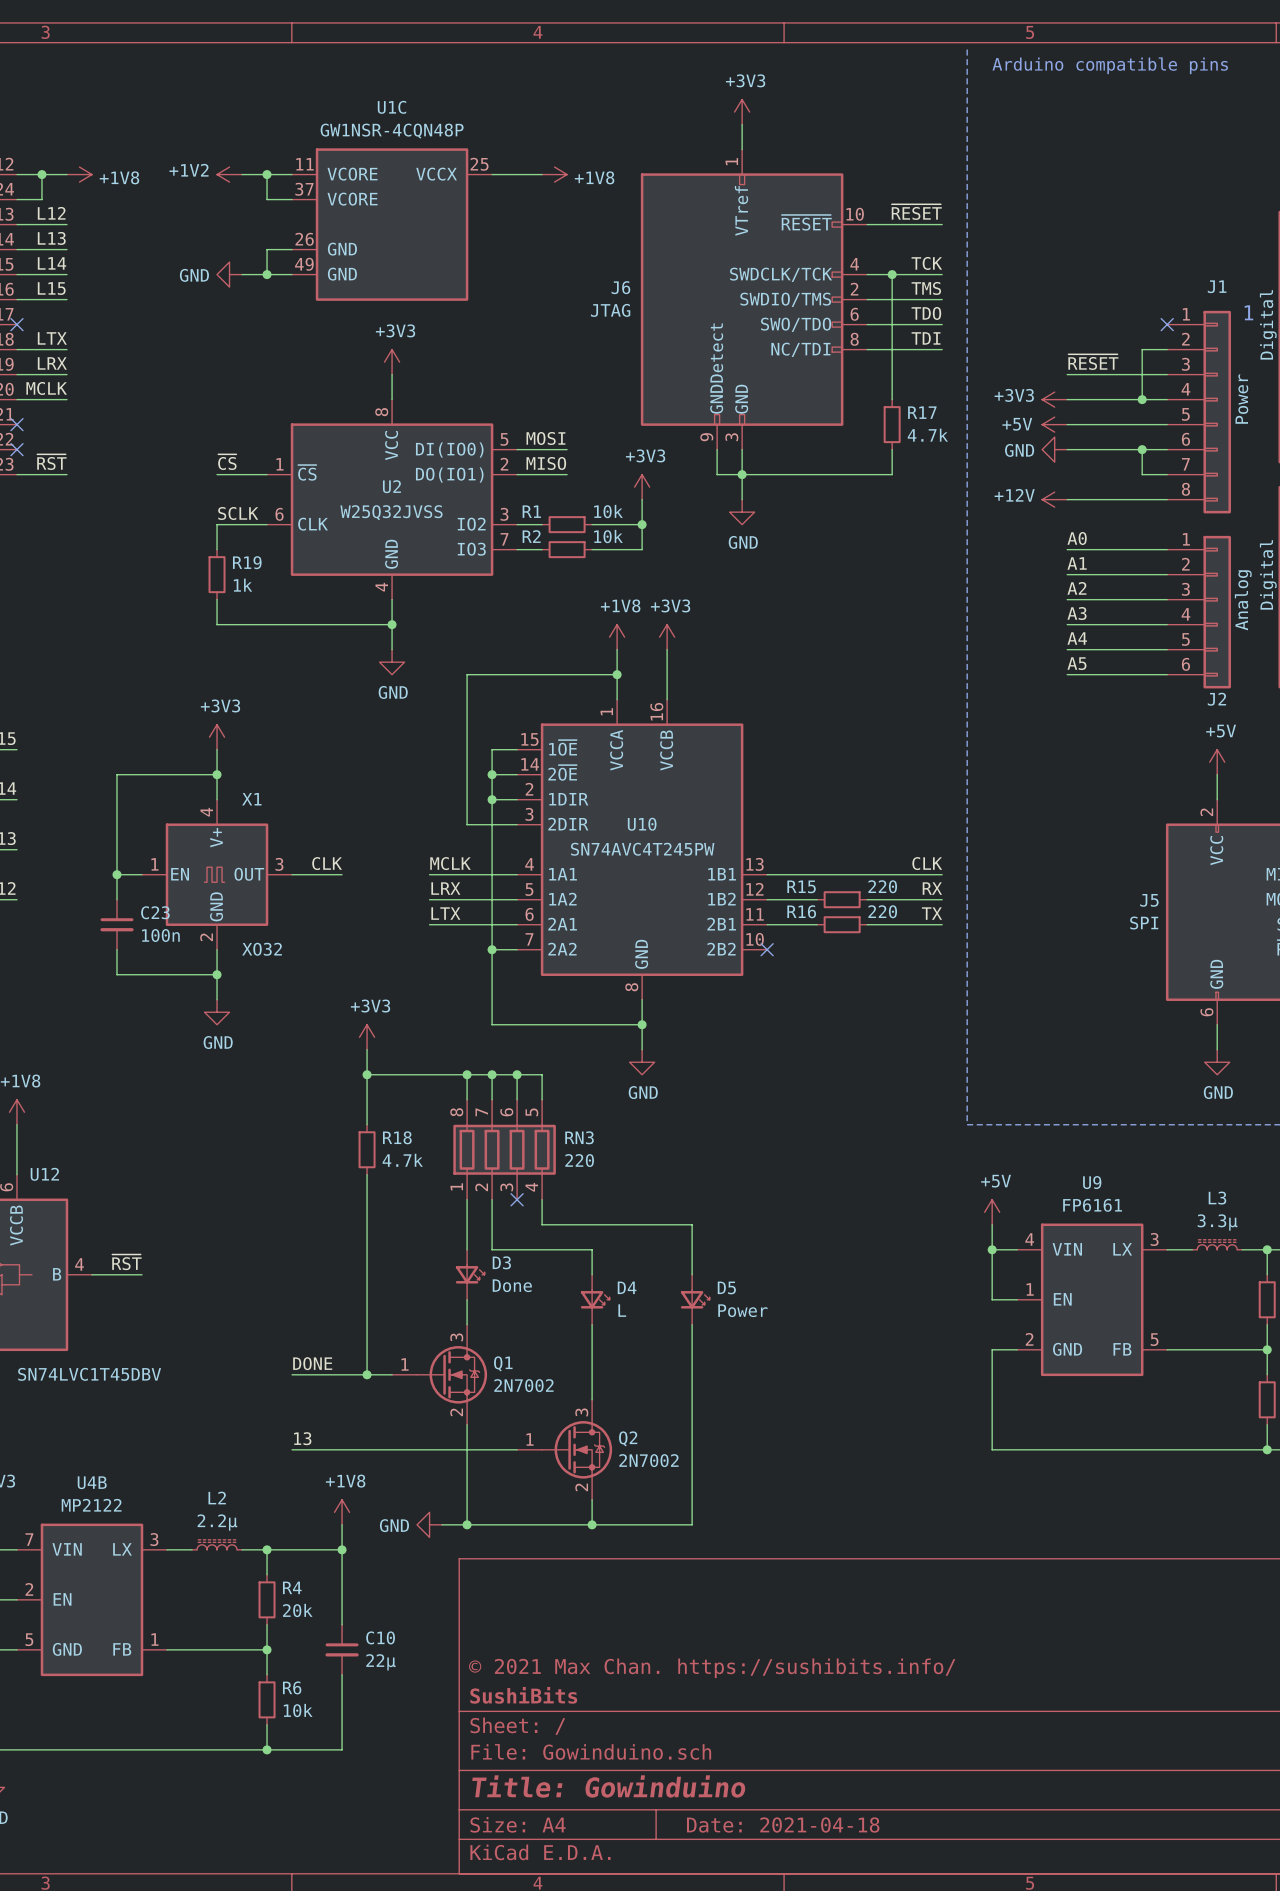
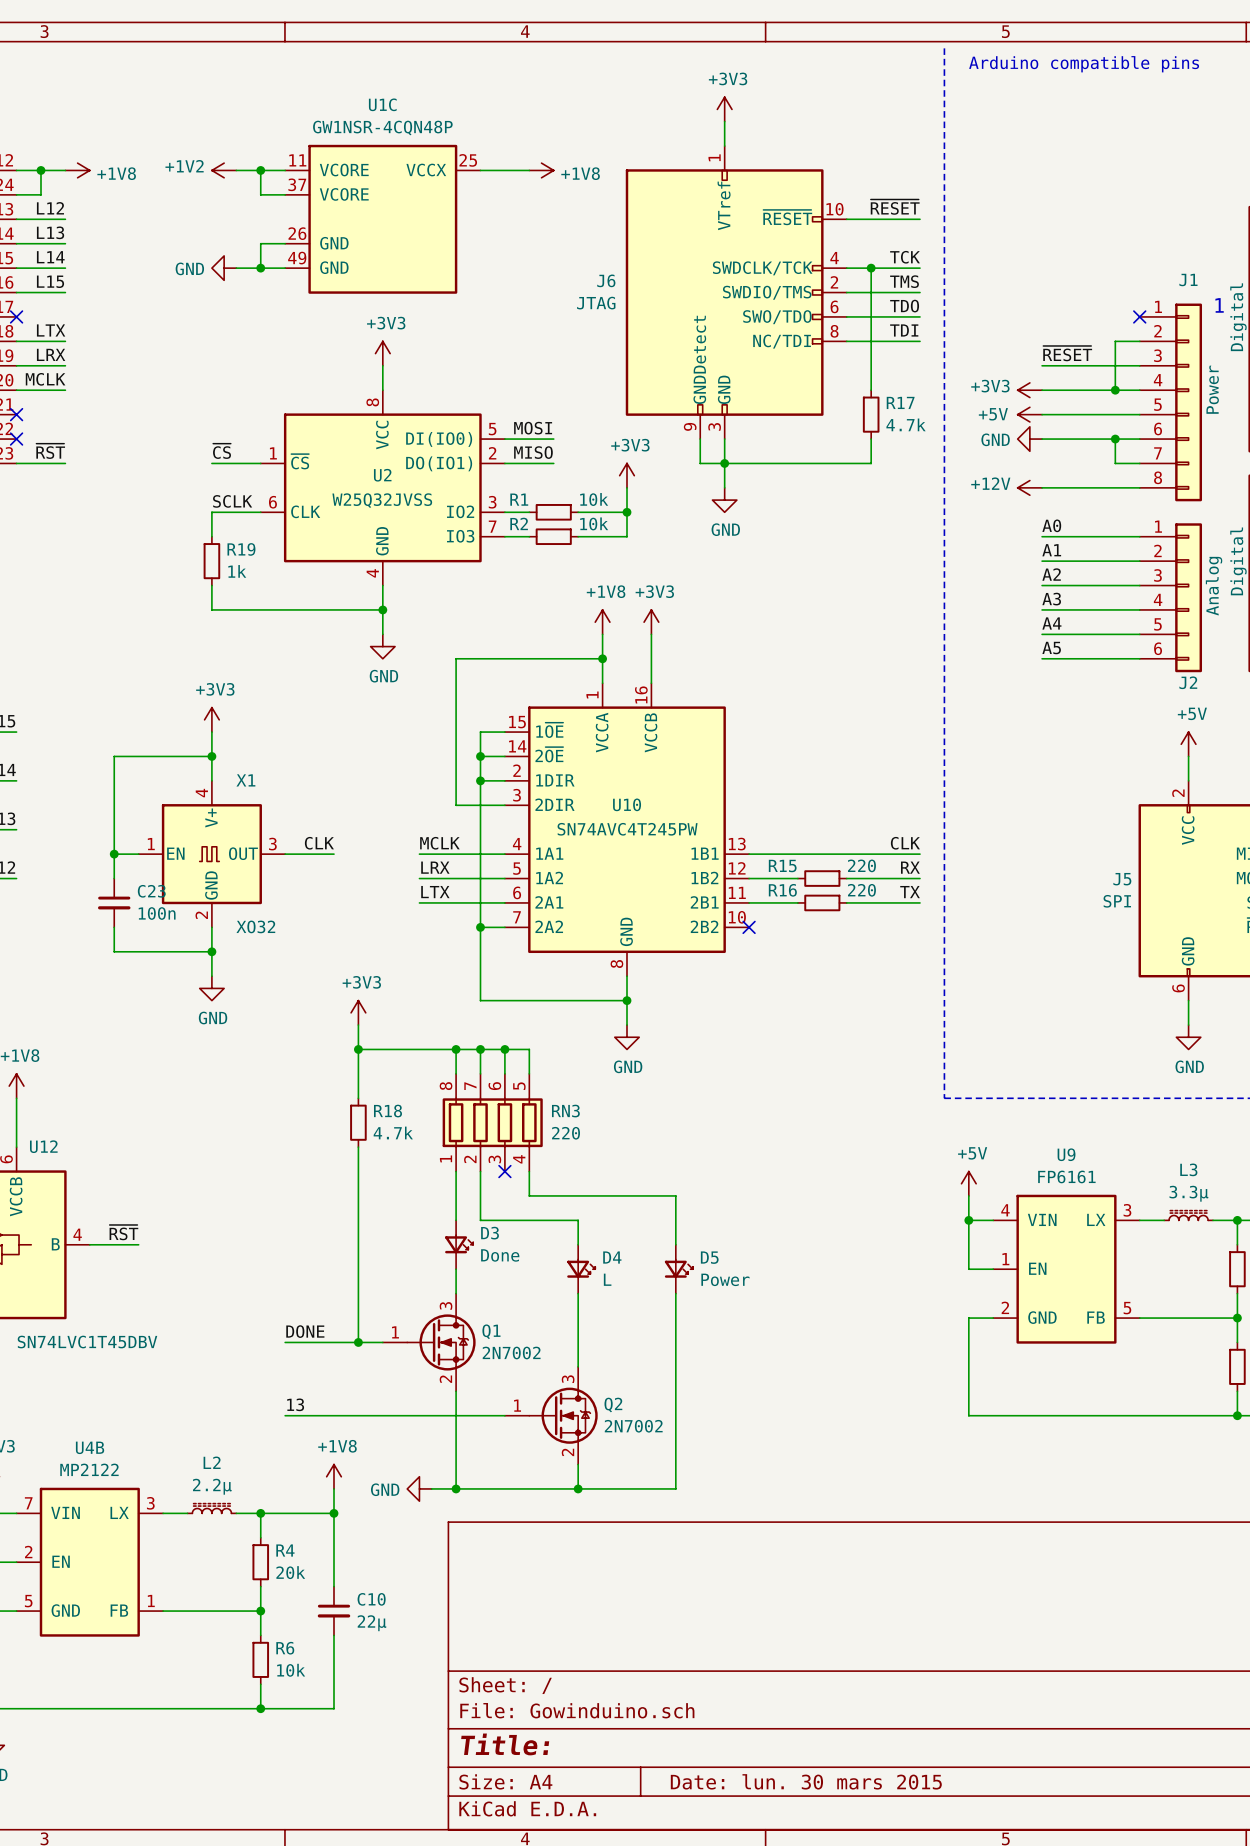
title block: © 2021 Max Chan. https://sushibits.info/ (712, 1668) -> none
title block: SushiBits (523, 1695) -> none
title block: Title: Gowinduino (608, 1786) -> Title: (505, 1744)
title block: Date: 2021-04-18 (783, 1825) -> Date: lun. 30 mars 2015 (806, 1781)

